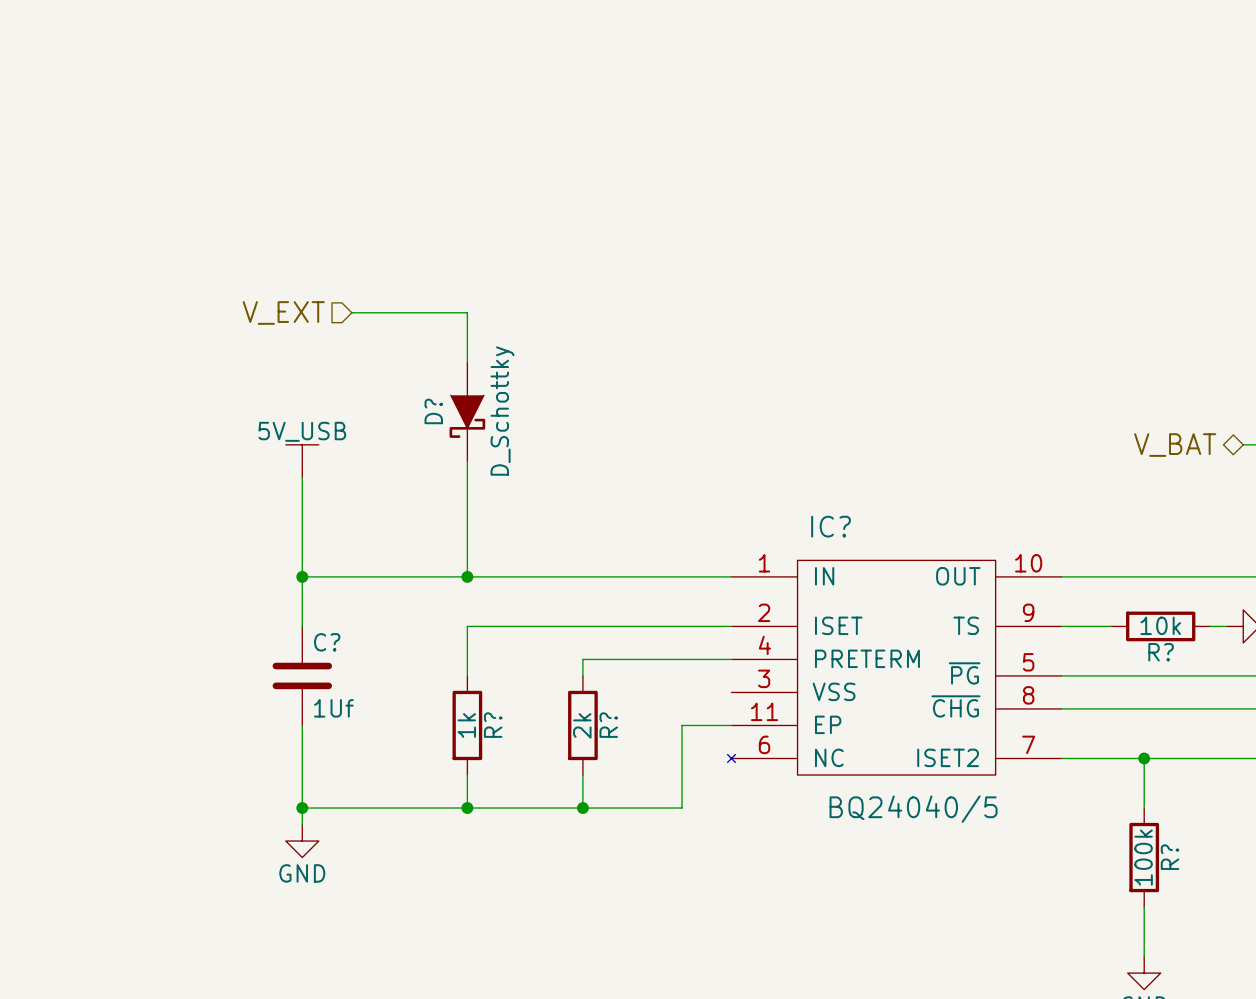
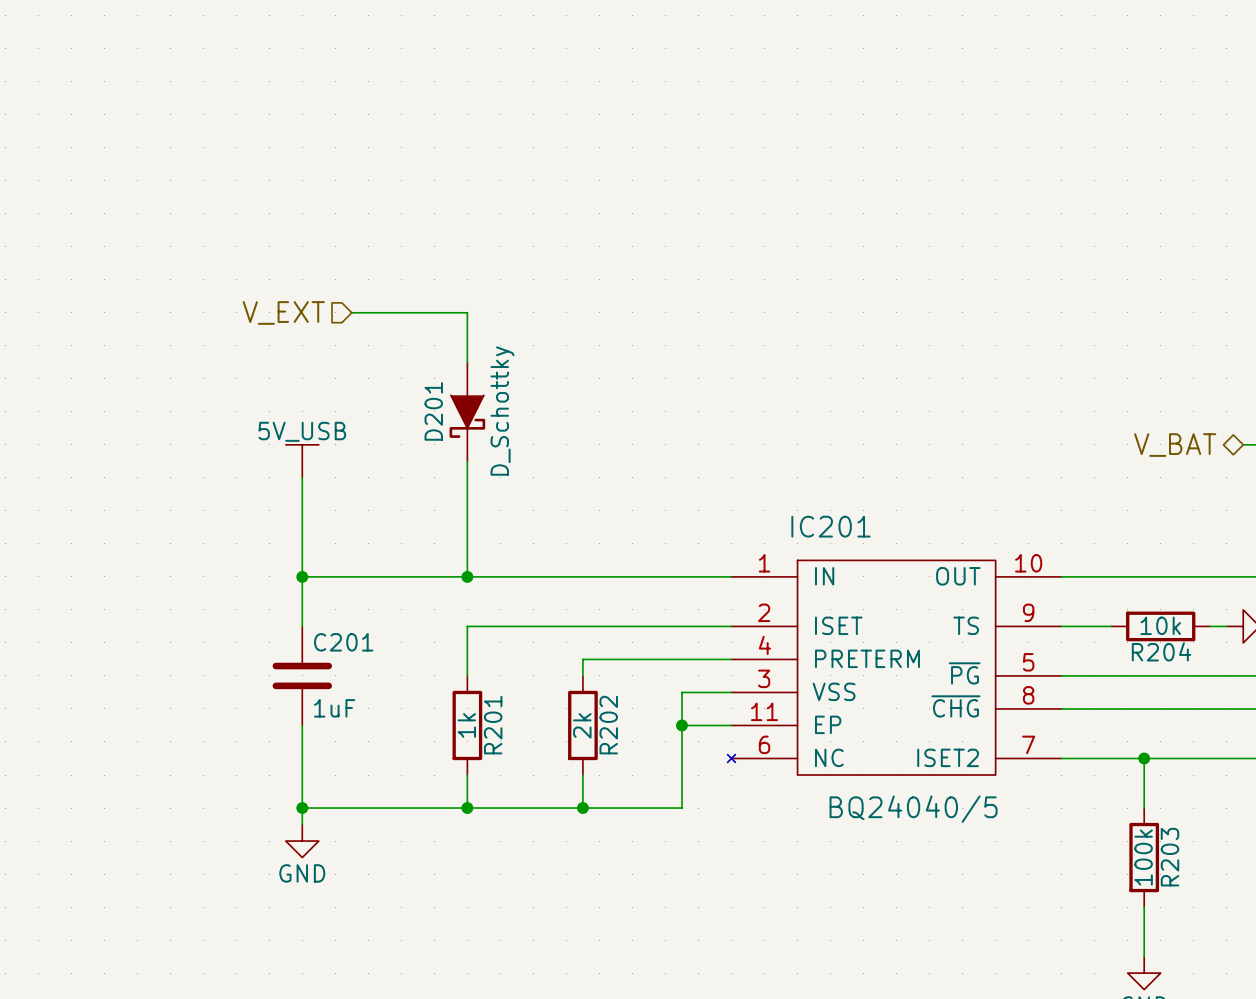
D? name: D? (433, 411) -> D201 (433, 411)
IC? name: IC? (831, 526) -> IC201 (831, 526)
C? name: C? (327, 642) -> C201 (343, 642)
R? name: R? (1161, 652) -> R204 (1161, 651)
wire: none -> (731, 692) (681, 692) (681, 725)
C? value: 1Uf (333, 708) -> 1uF (334, 708)
R? name: R? (493, 725) -> R201 (493, 725)
R? name: R? (608, 725) -> R202 (608, 725)
junction: none -> (681, 725)
R? name: R? (1169, 857) -> R203 (1169, 857)

